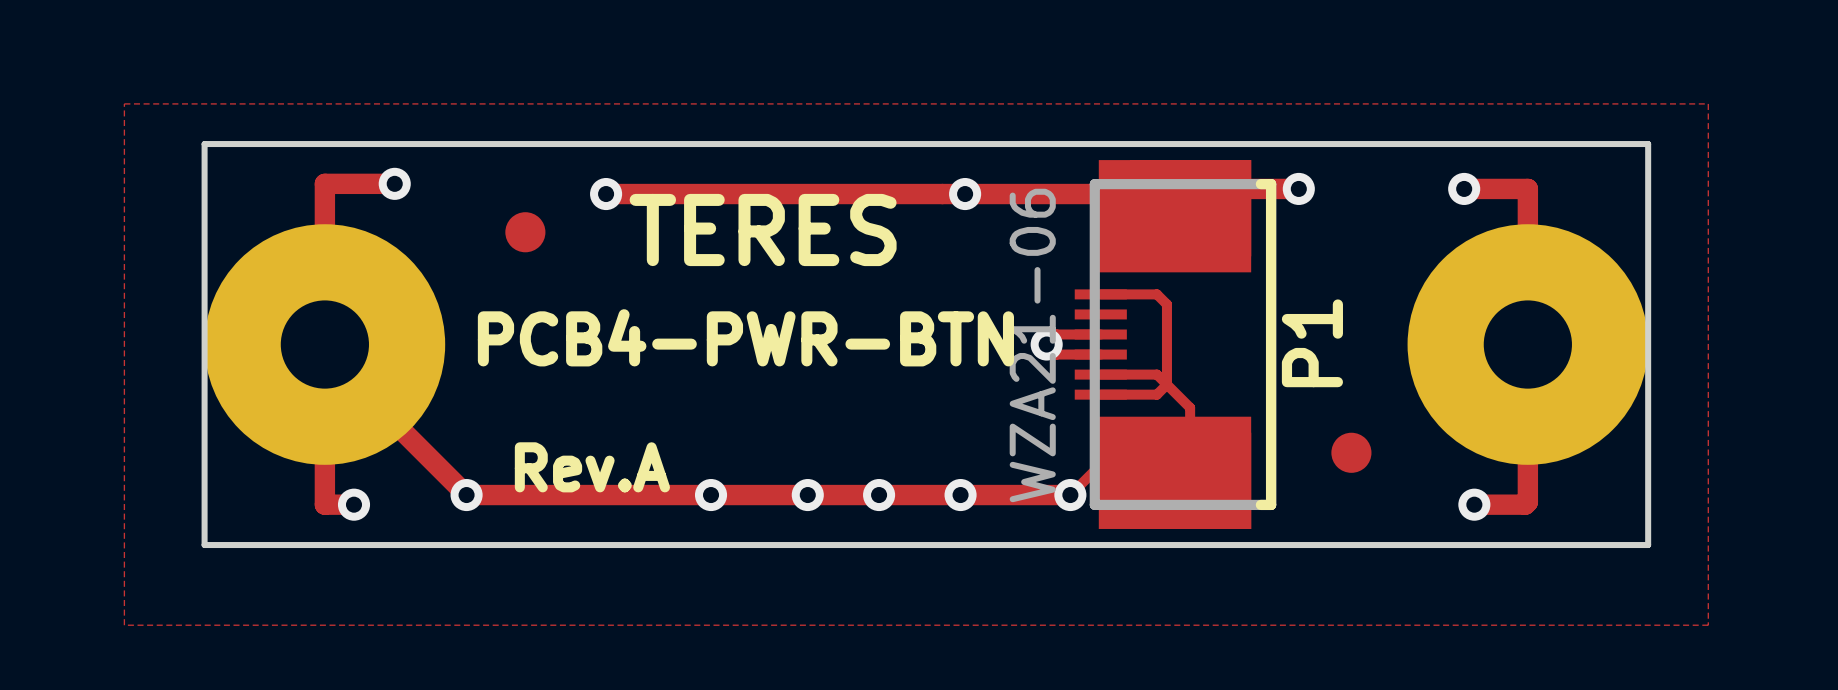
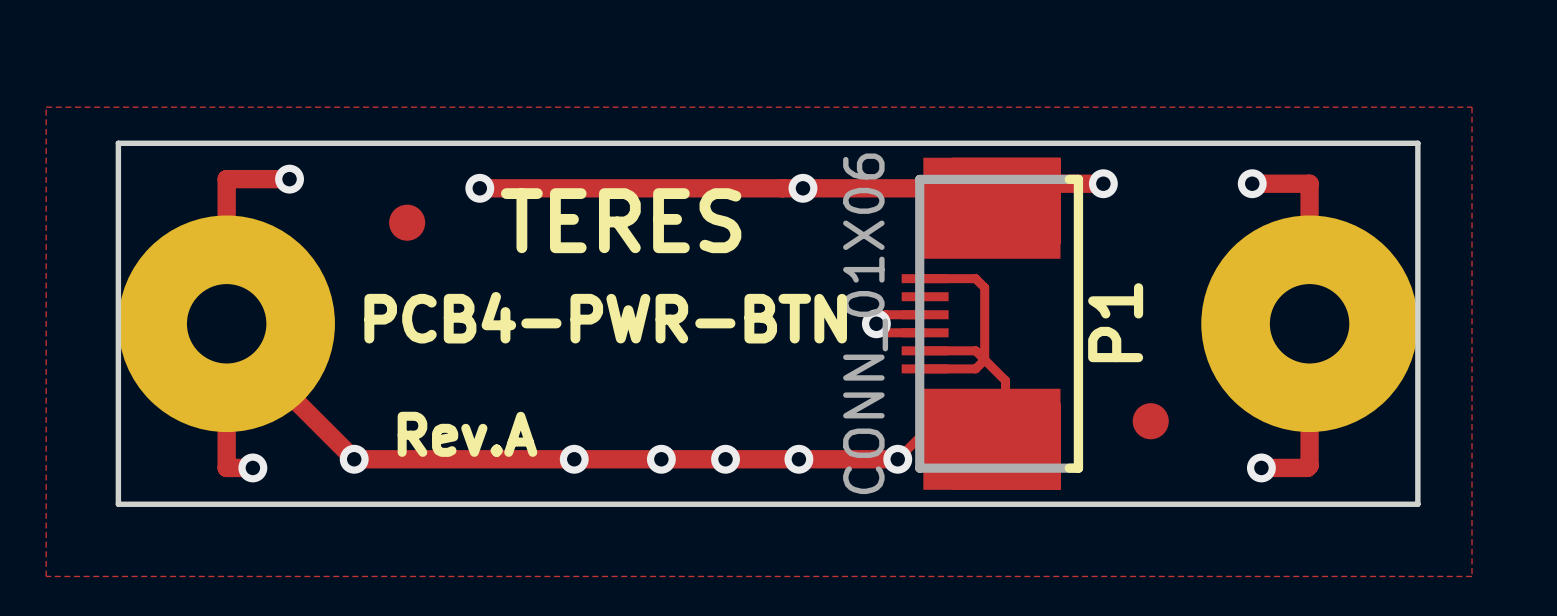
P1 value: WZA21-06 (1032, 345) -> CONN_01X06 (865, 323)

